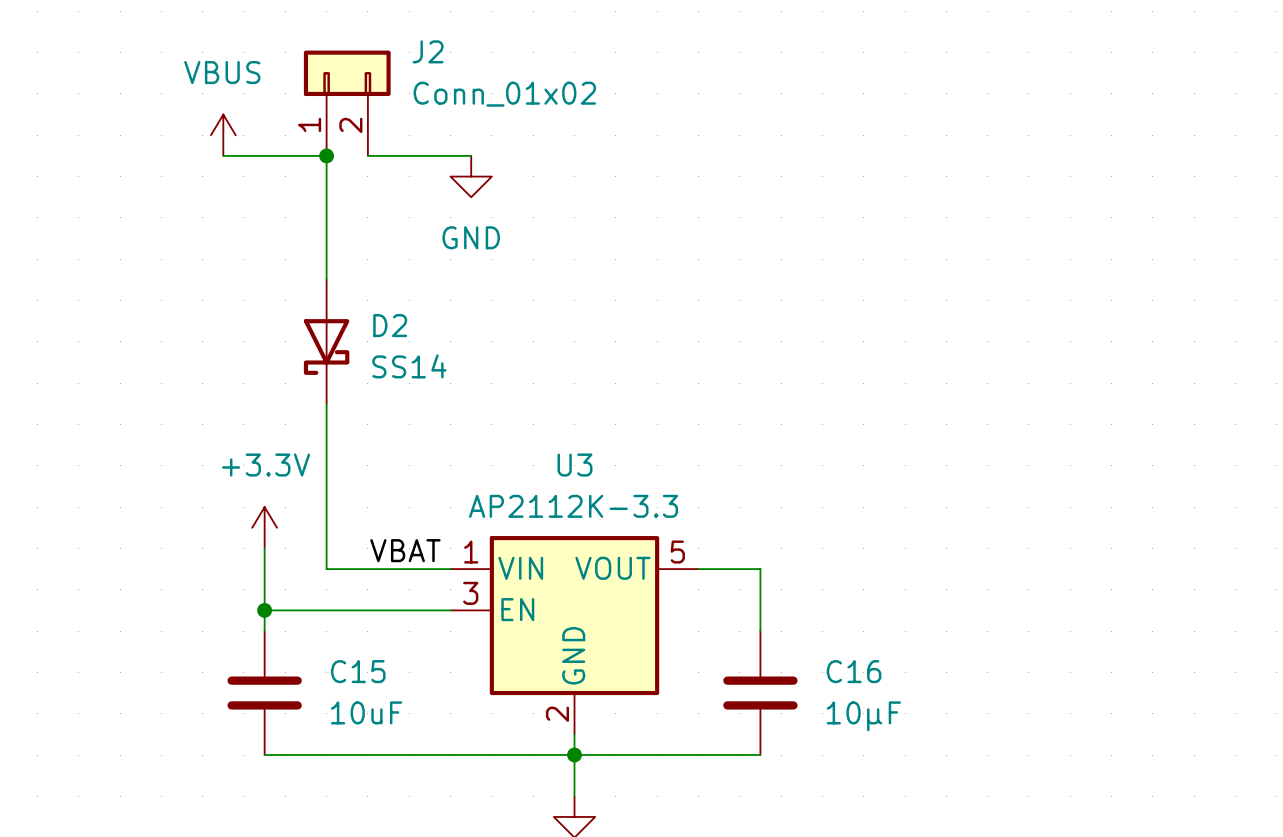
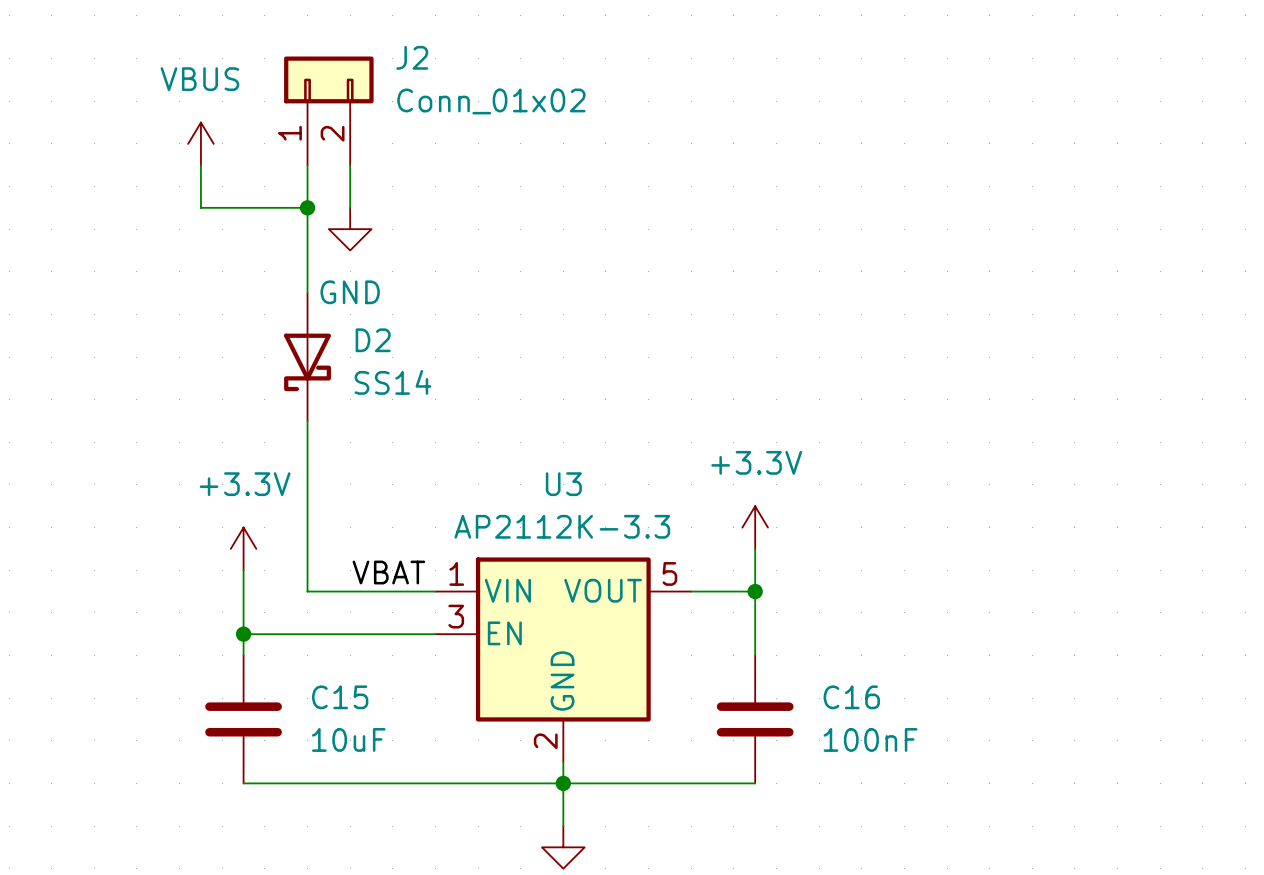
wire: (223, 155) (326, 155) -> (200, 165) (200, 207) (307, 207)
junction position: (326, 155) -> (307, 207)
wire: (367, 155) (471, 155) -> (350, 165) (350, 207)
power symbol position: GND (471, 176) -> GND (350, 229)
power symbol: none -> +3.3V (755, 527)
wire: none -> (755, 548) (755, 591)
junction: none -> (755, 591)
C16 value: 10µF (863, 716) -> 100nF (870, 739)

